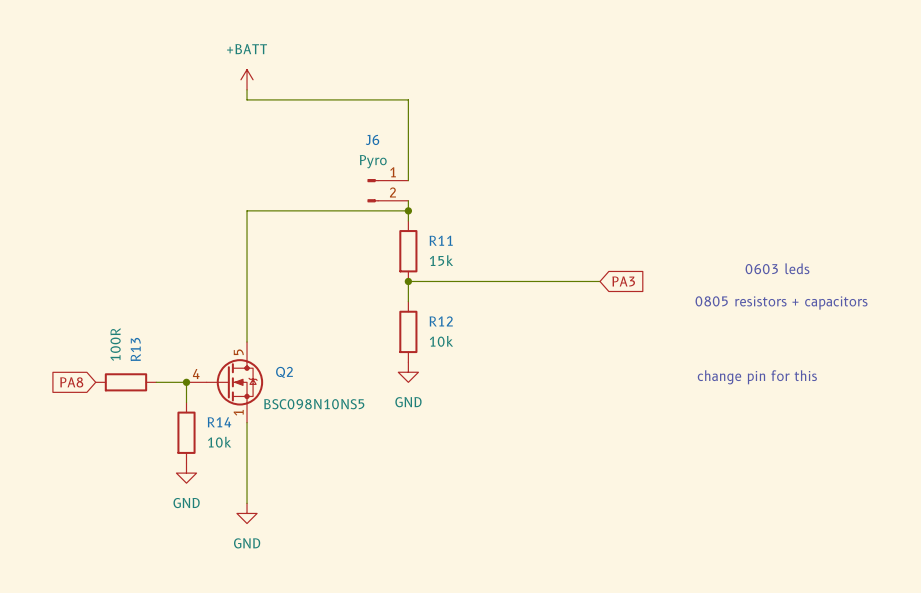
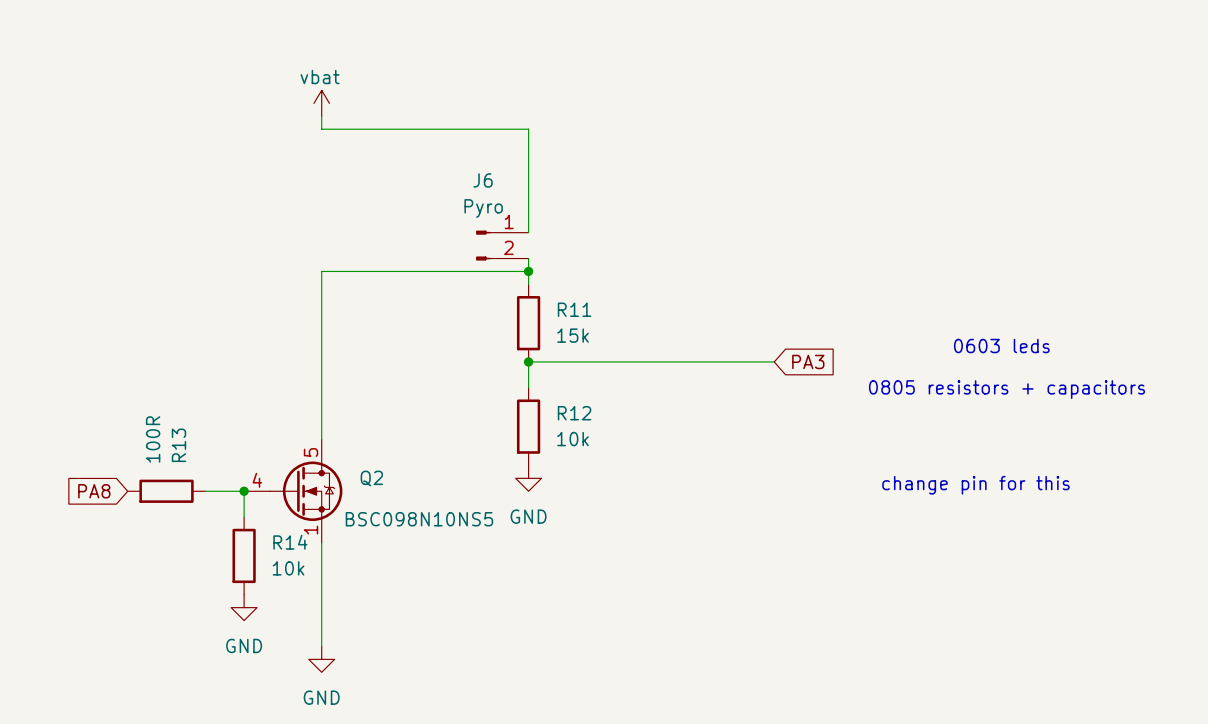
power symbol: +BATT (247, 79) -> vbat (321, 103)

